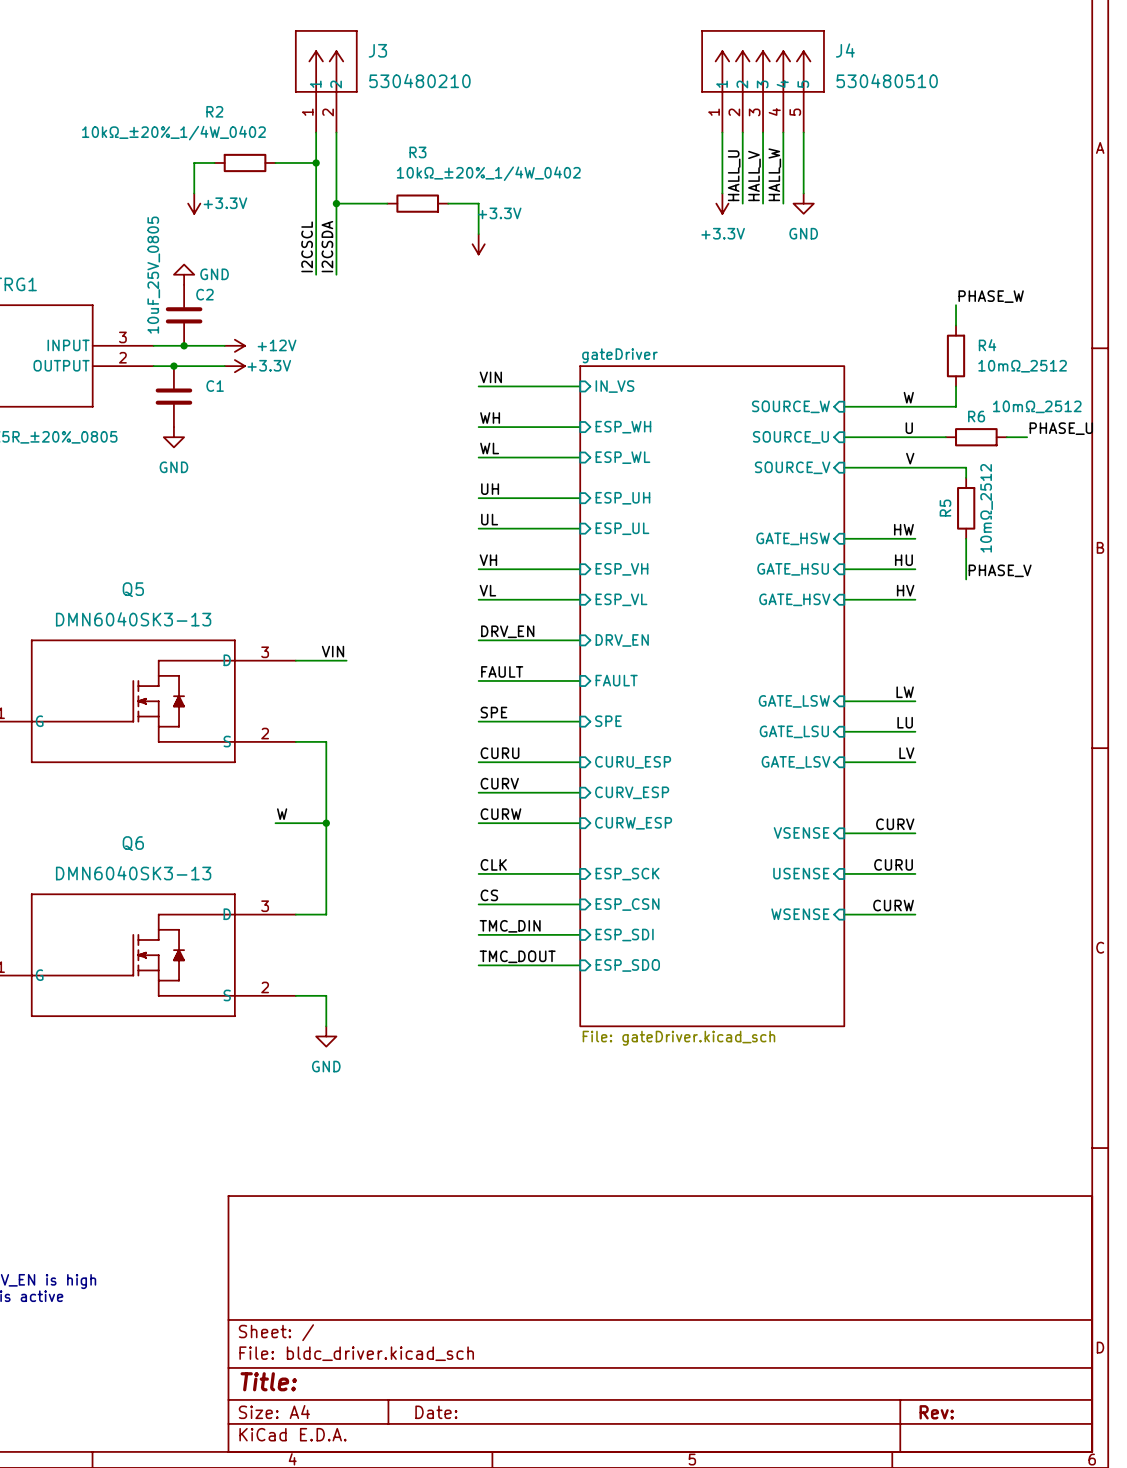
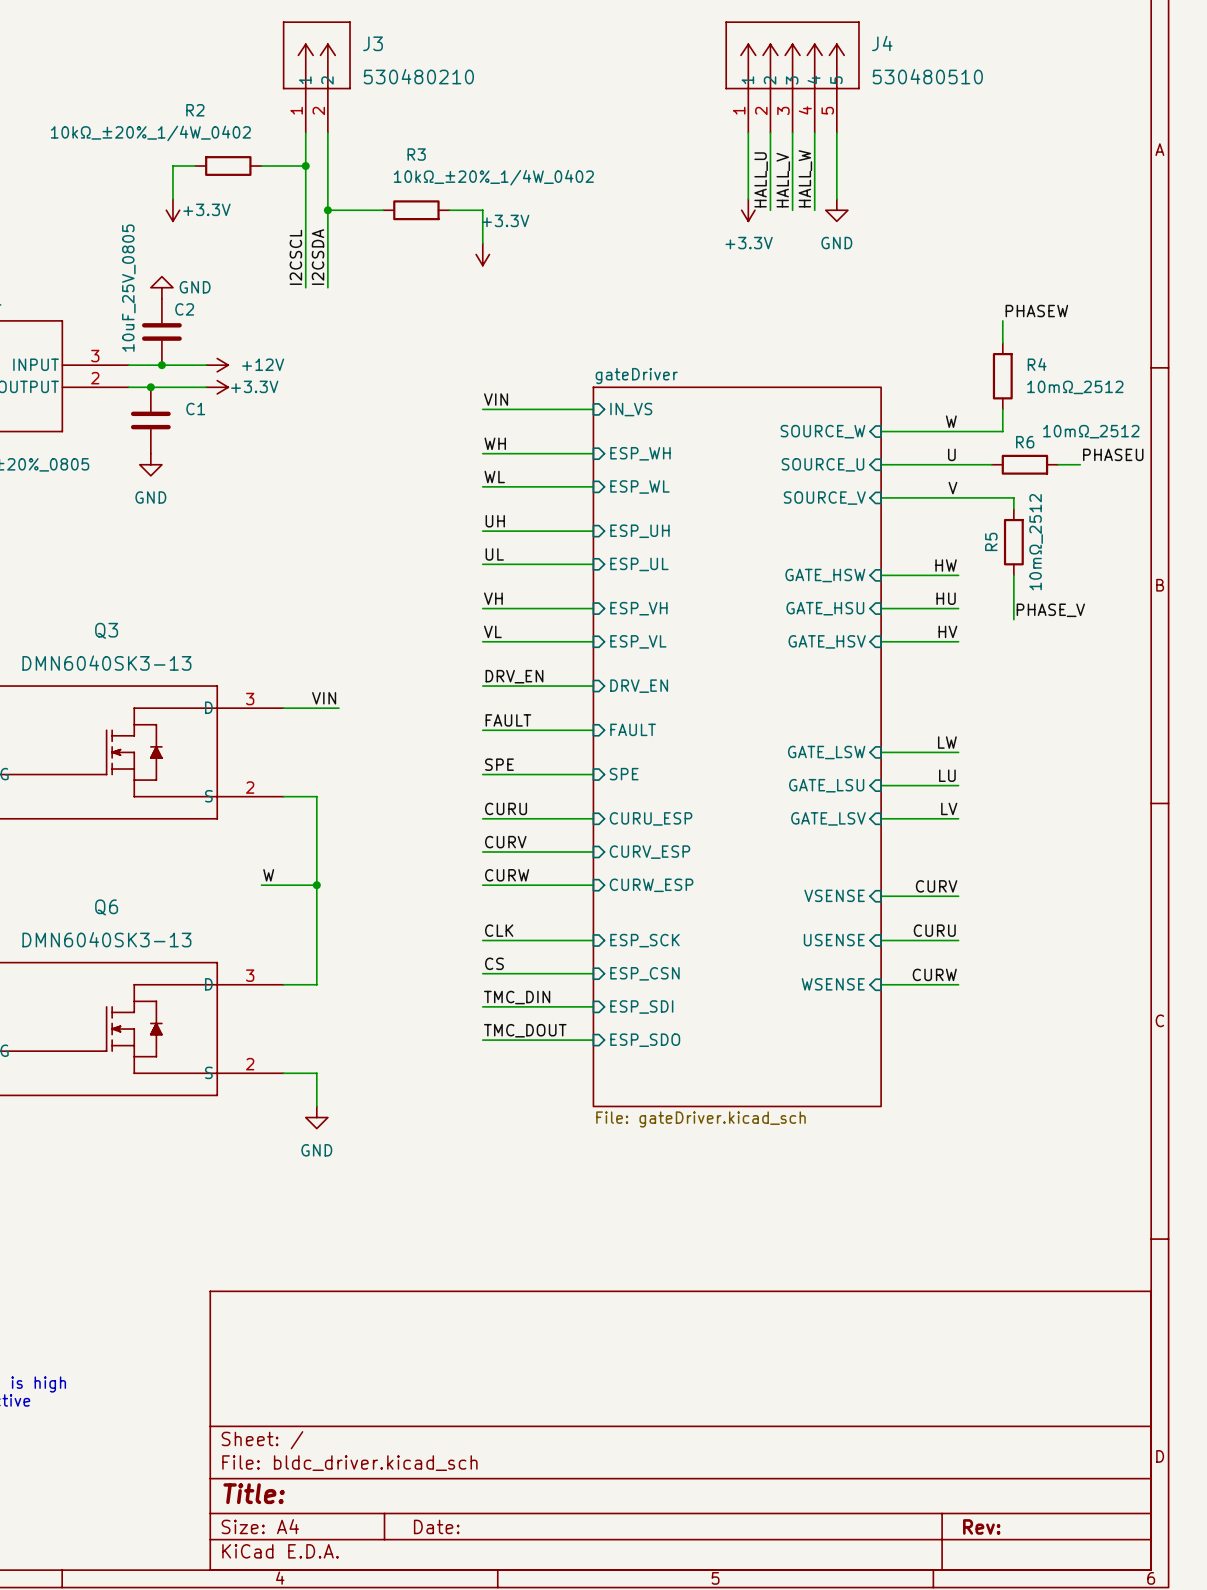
label: PHASE_W (991, 296) -> PHASEW (1036, 311)
label: PHASE_U (1061, 428) -> PHASEU (1113, 454)
Q5 name: Q5 (133, 589) -> Q3 (106, 630)

